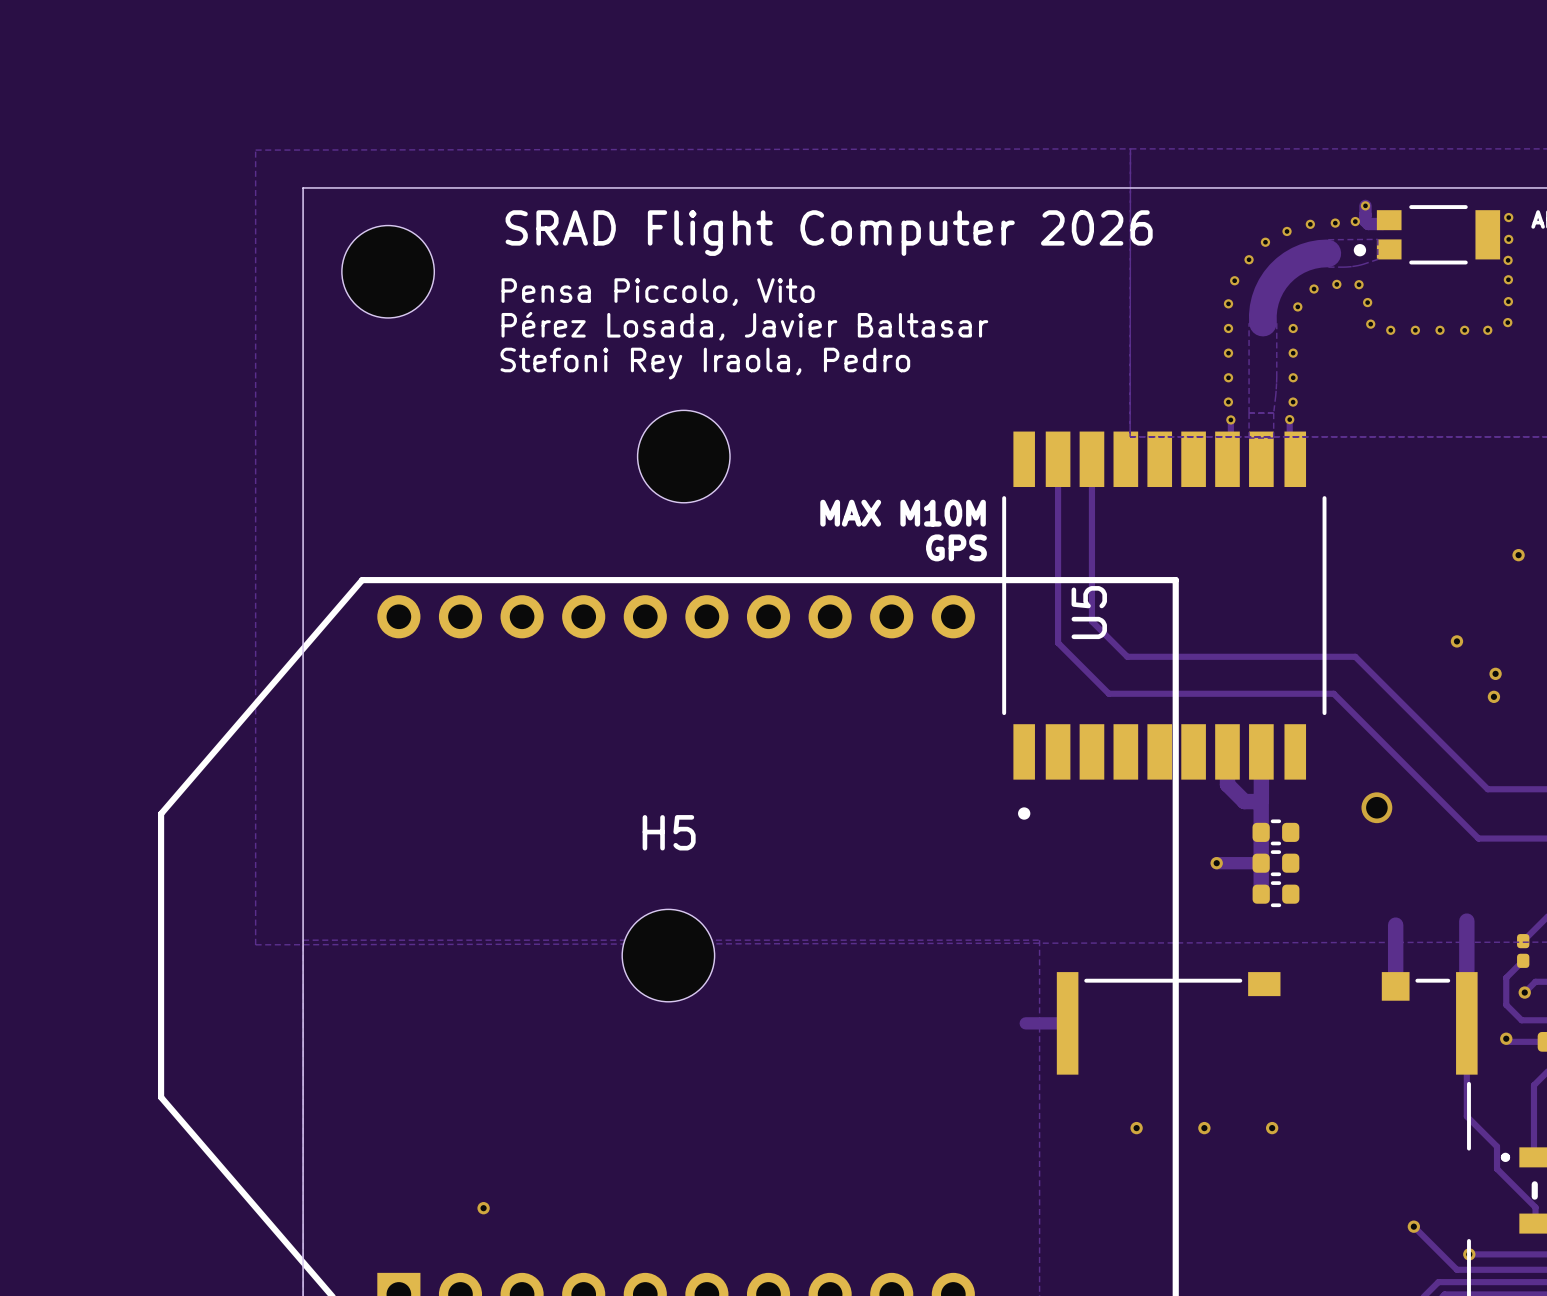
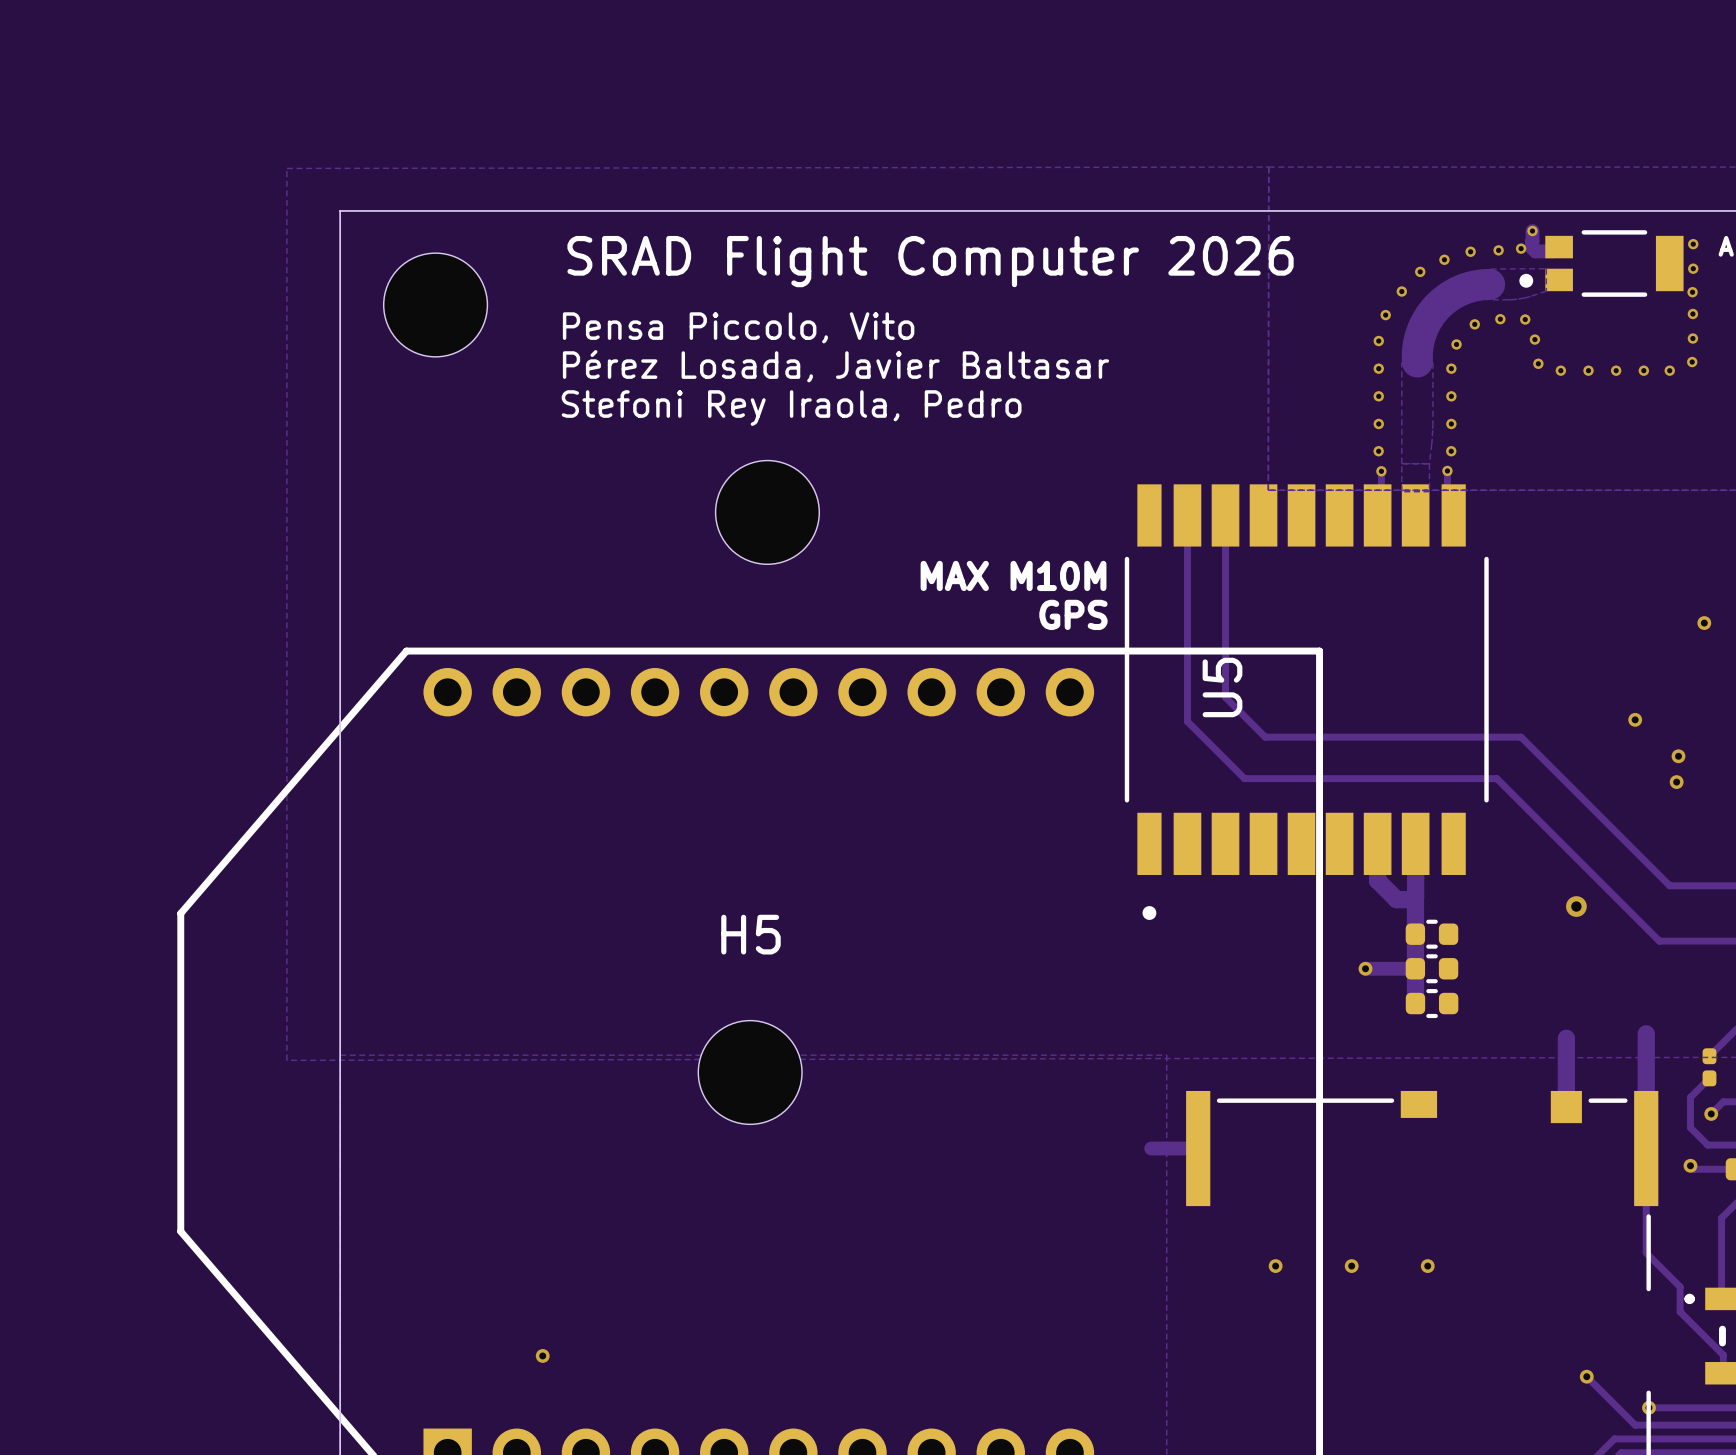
via: (1376, 807) -> none
via: none -> (1576, 906)

